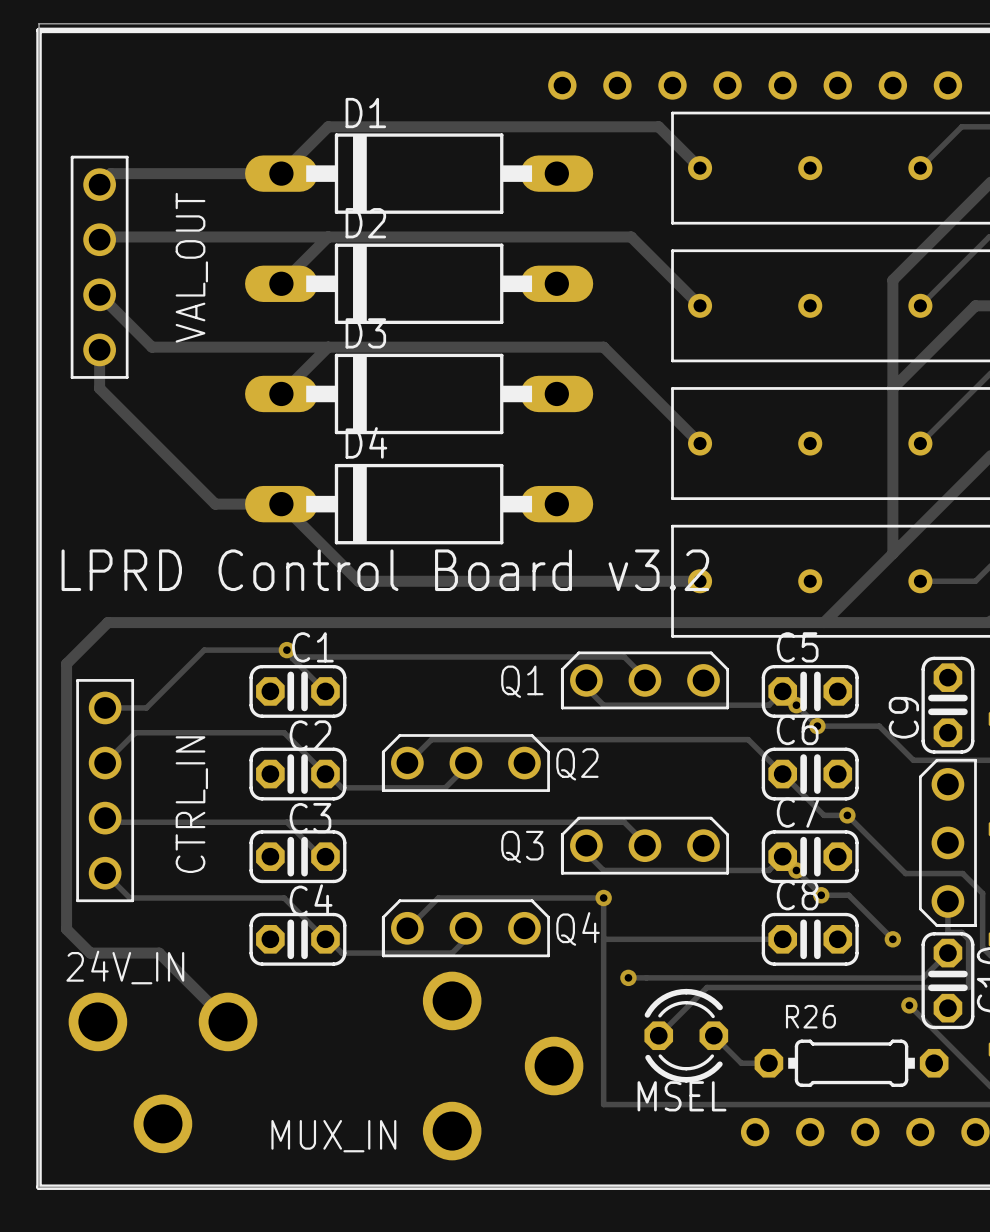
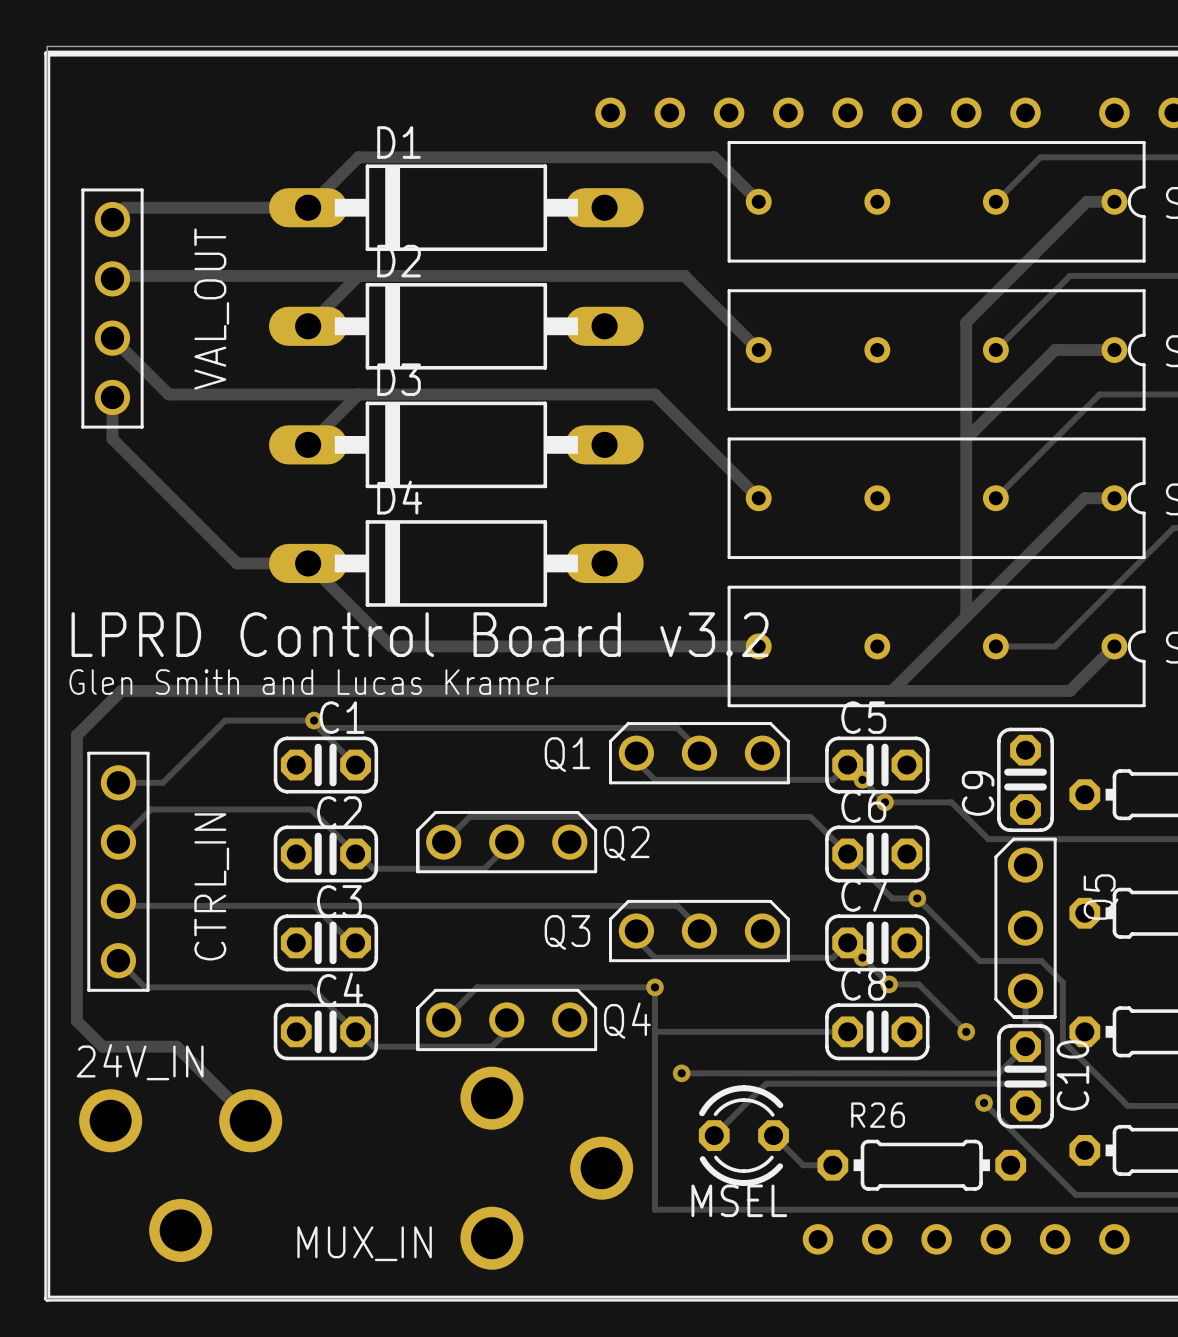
text: none -> Glen Smith and Lucas Kramer (311, 682)

